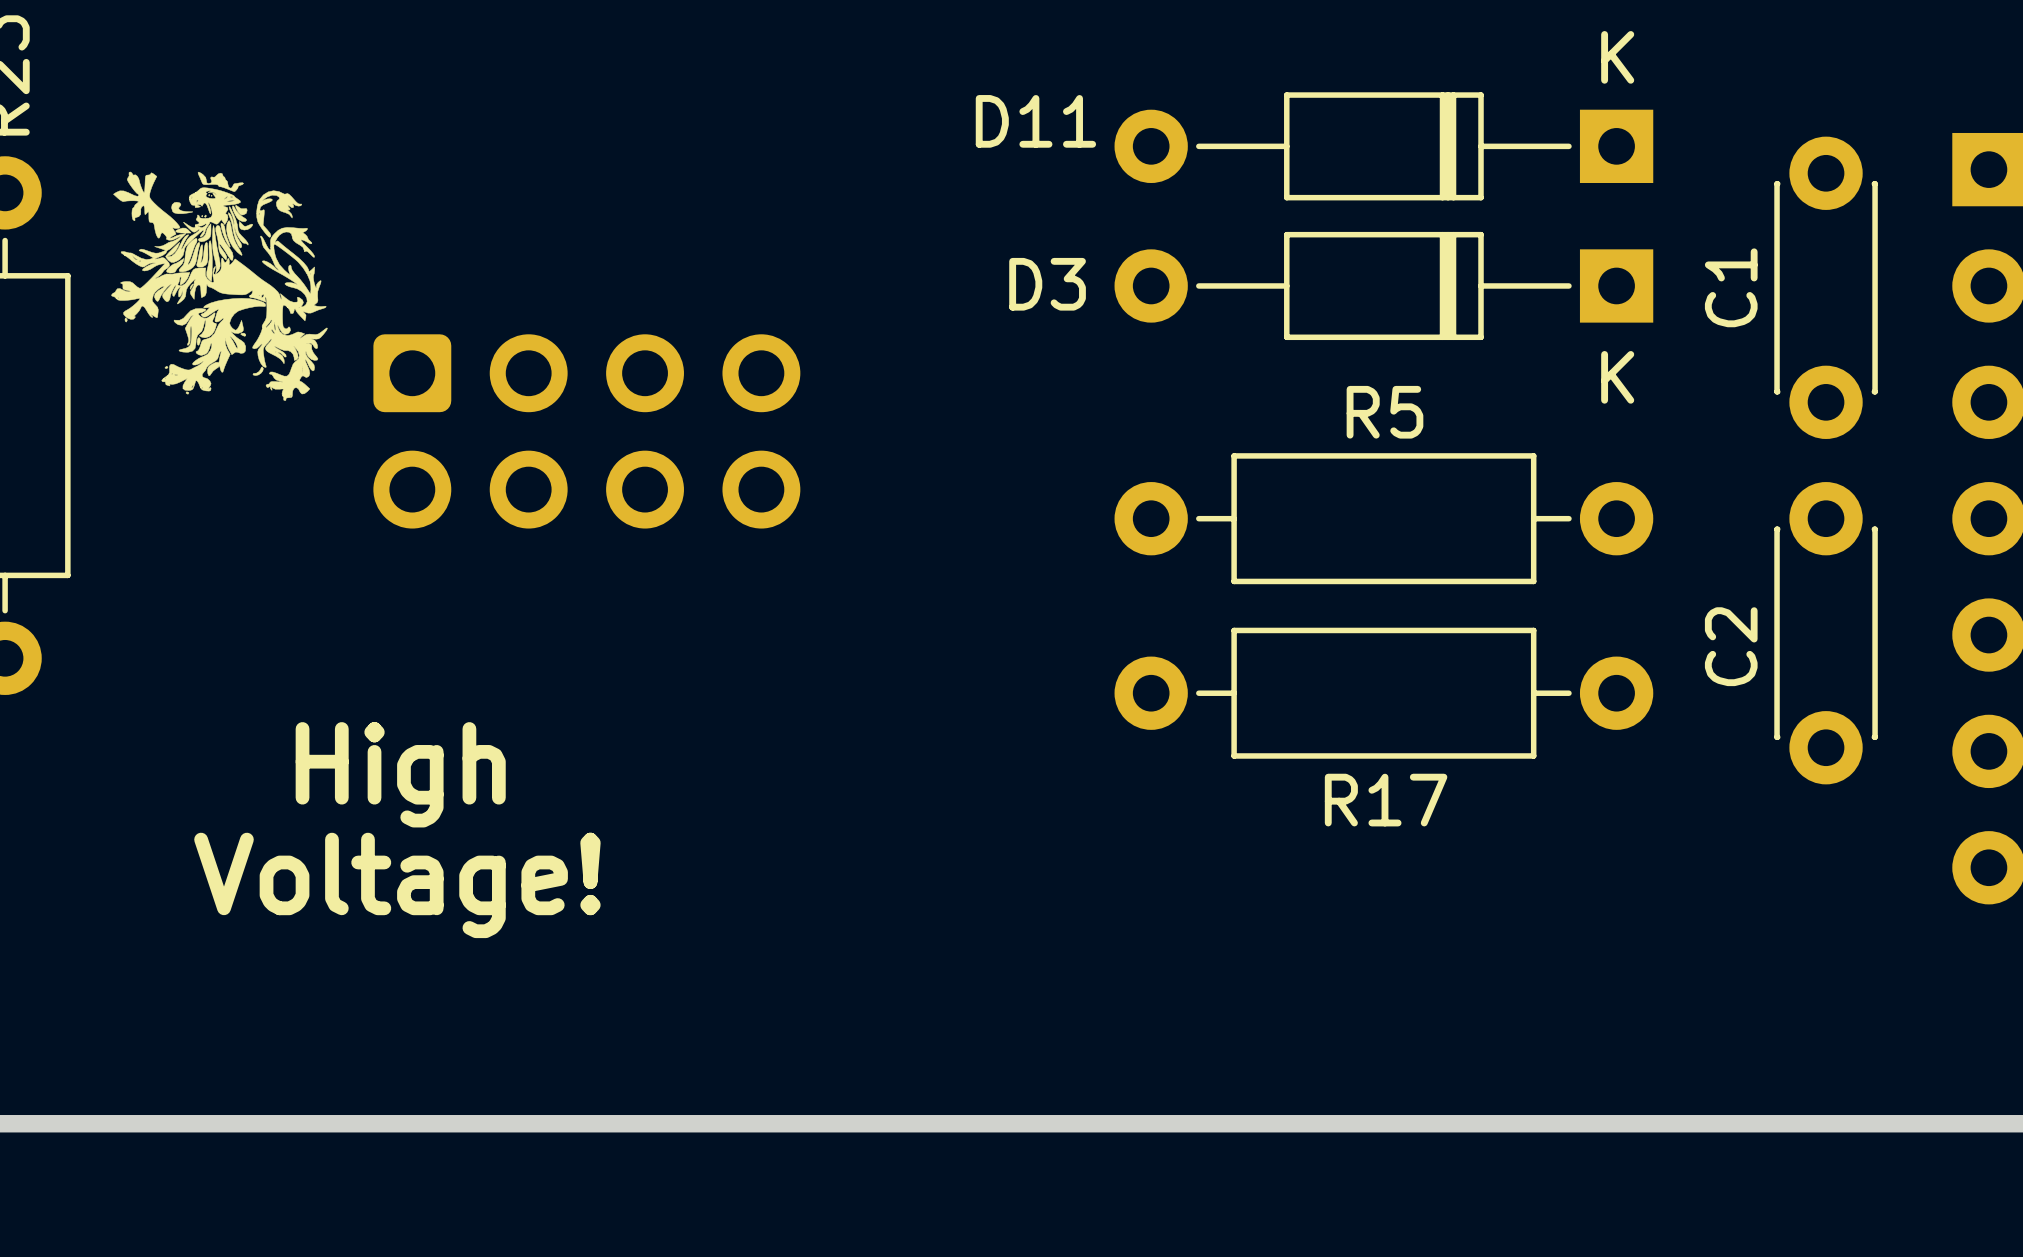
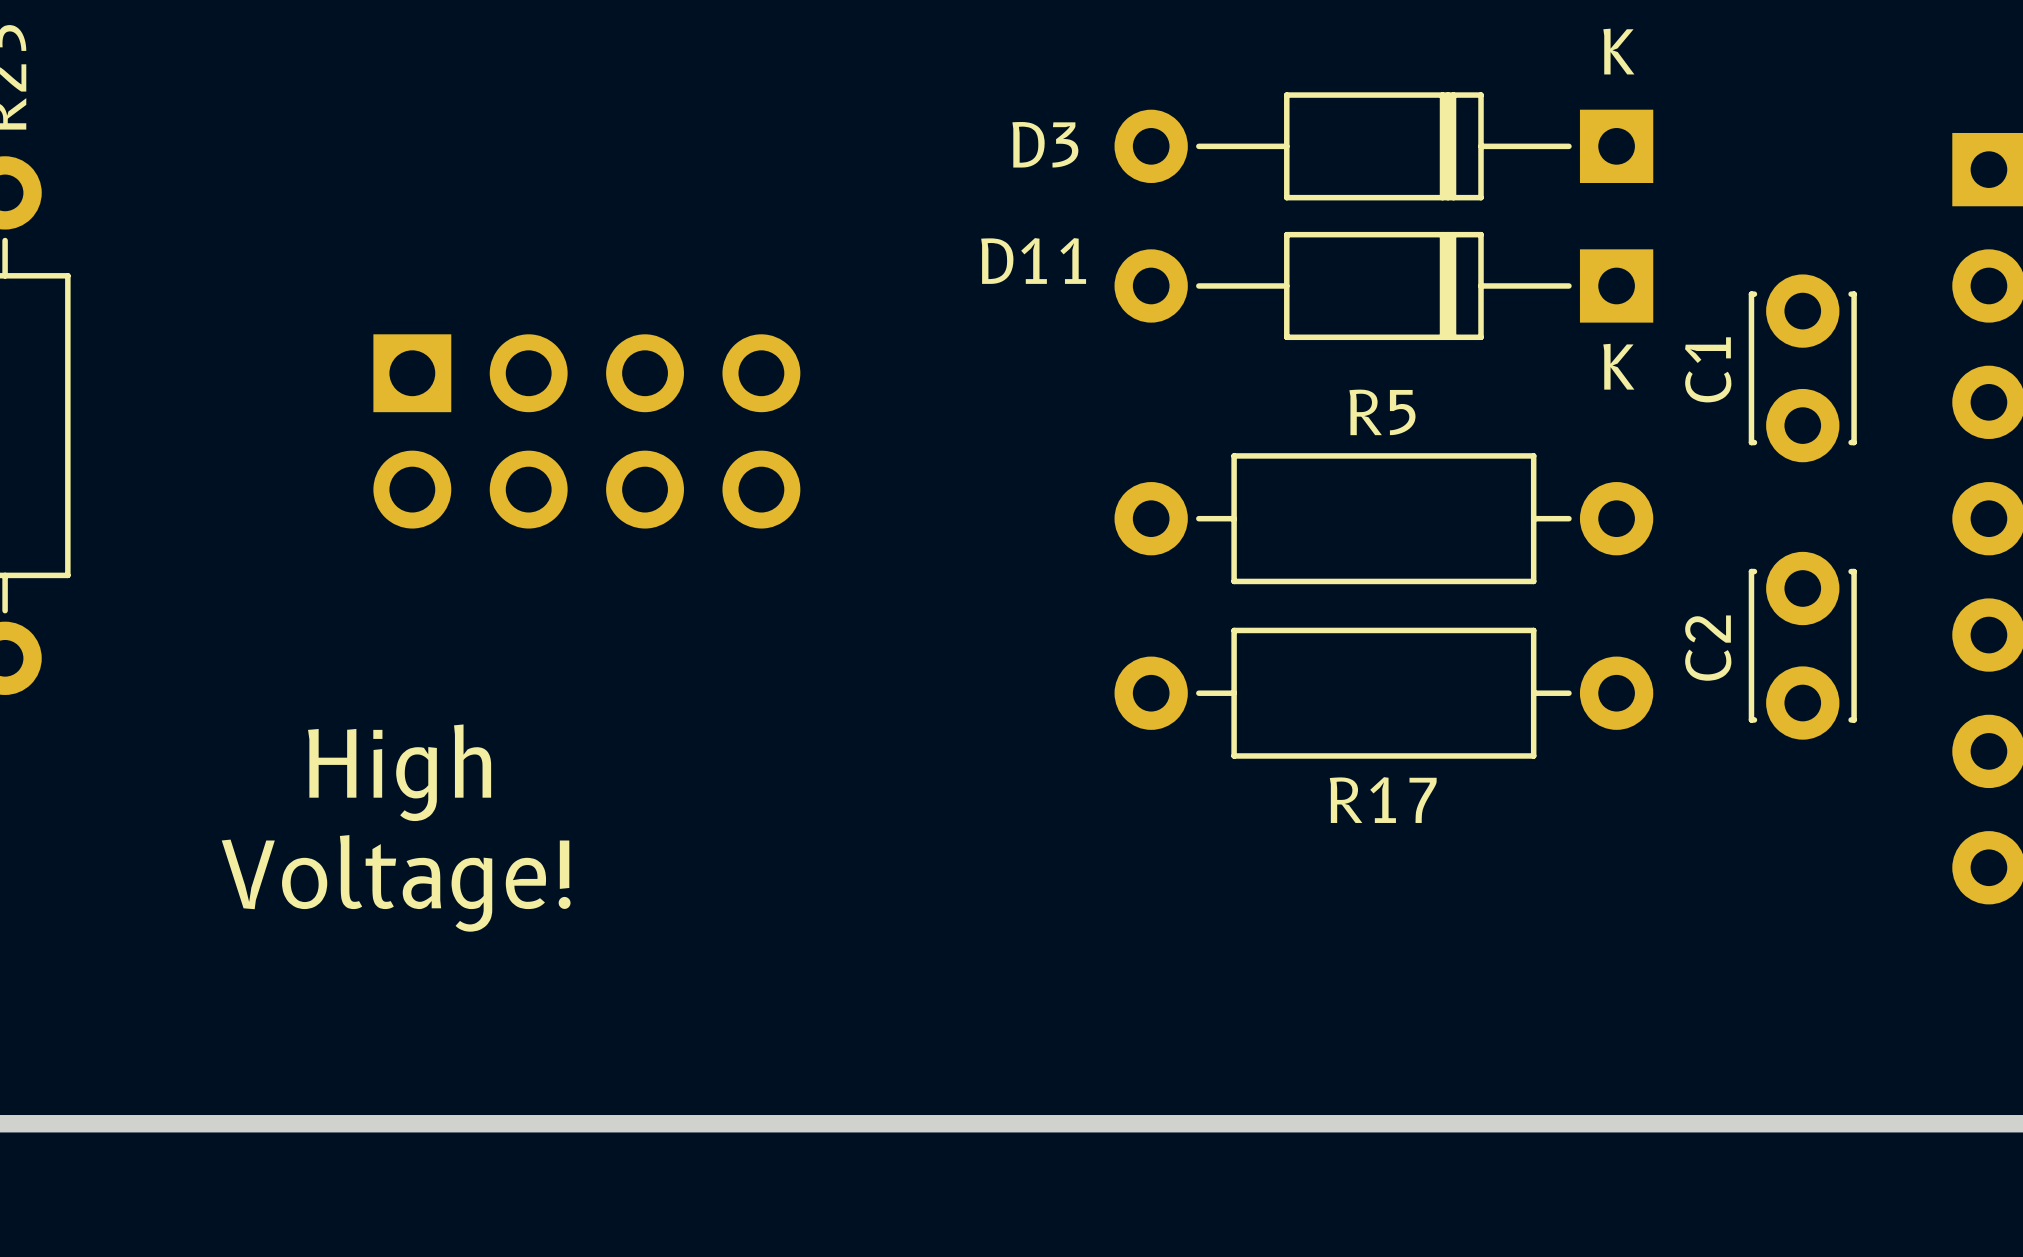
D11 text position: K (1617, 57) -> K (1618, 366)
C1 footprint: [1774, 136, 1878, 439] -> [1748, 274, 1857, 463]
D11 position: (1383, 146) -> (1383, 285)
drawing: [111, 171, 328, 401] -> none
D3 position: (1383, 285) -> (1383, 146)
part footprint: [373, 334, 801, 529] -> [373, 334, 801, 529]
D3 text position: K (1617, 377) -> K (1618, 51)
C2 footprint: [1774, 482, 1878, 785] -> [1748, 551, 1857, 740]

